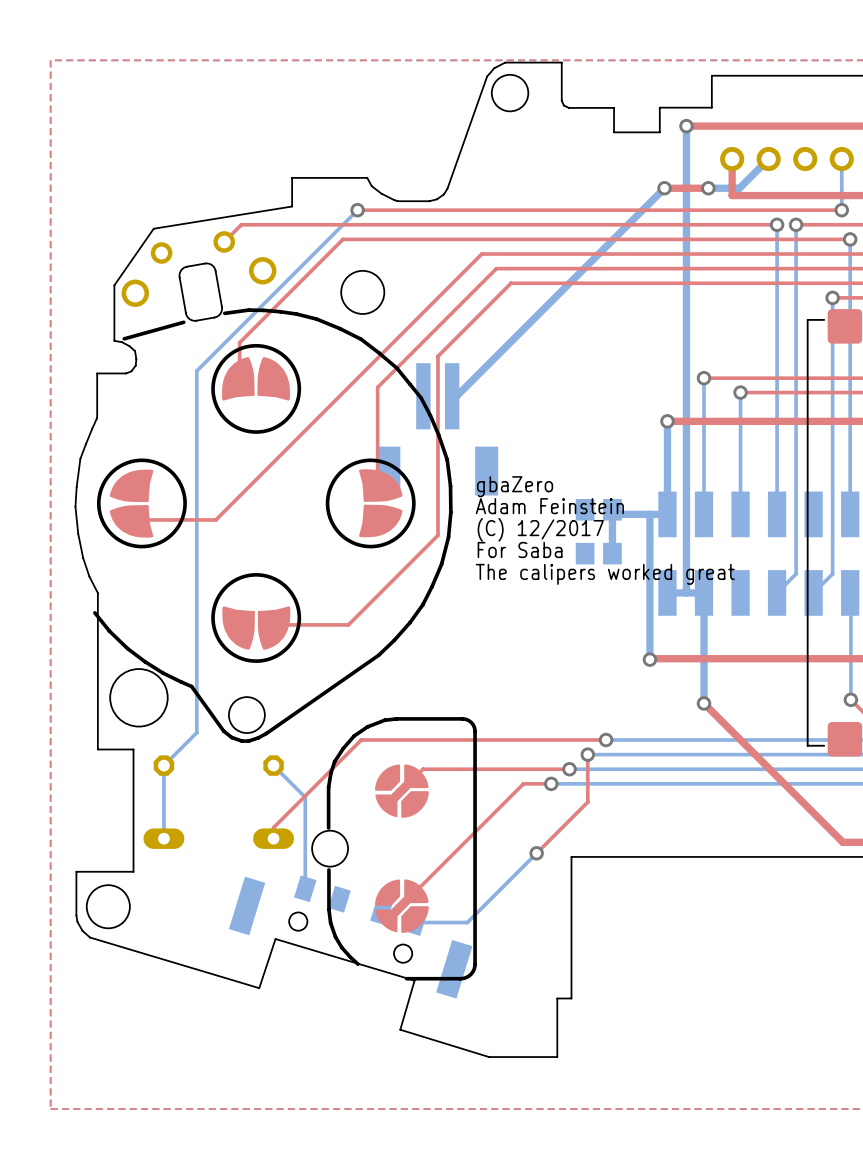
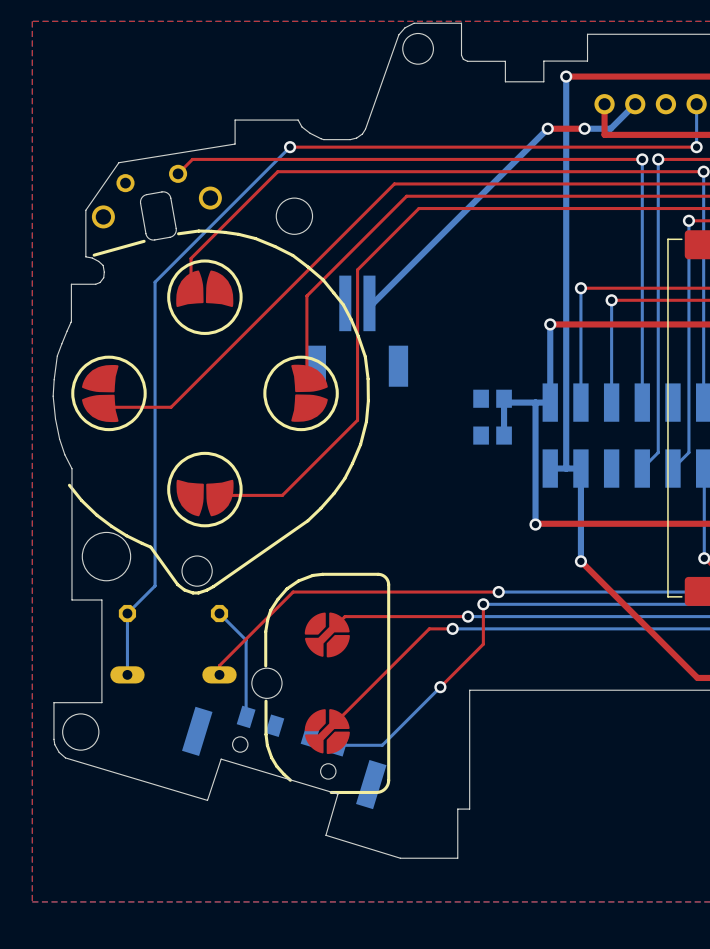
text: gbaZero (515, 486) -> none
text: Adam Feinstein (549, 506) -> none
text: (C) 12/2017 (540, 529) -> none
text: For Saba (520, 550) -> none
text: The calipers worked great (605, 574) -> none

